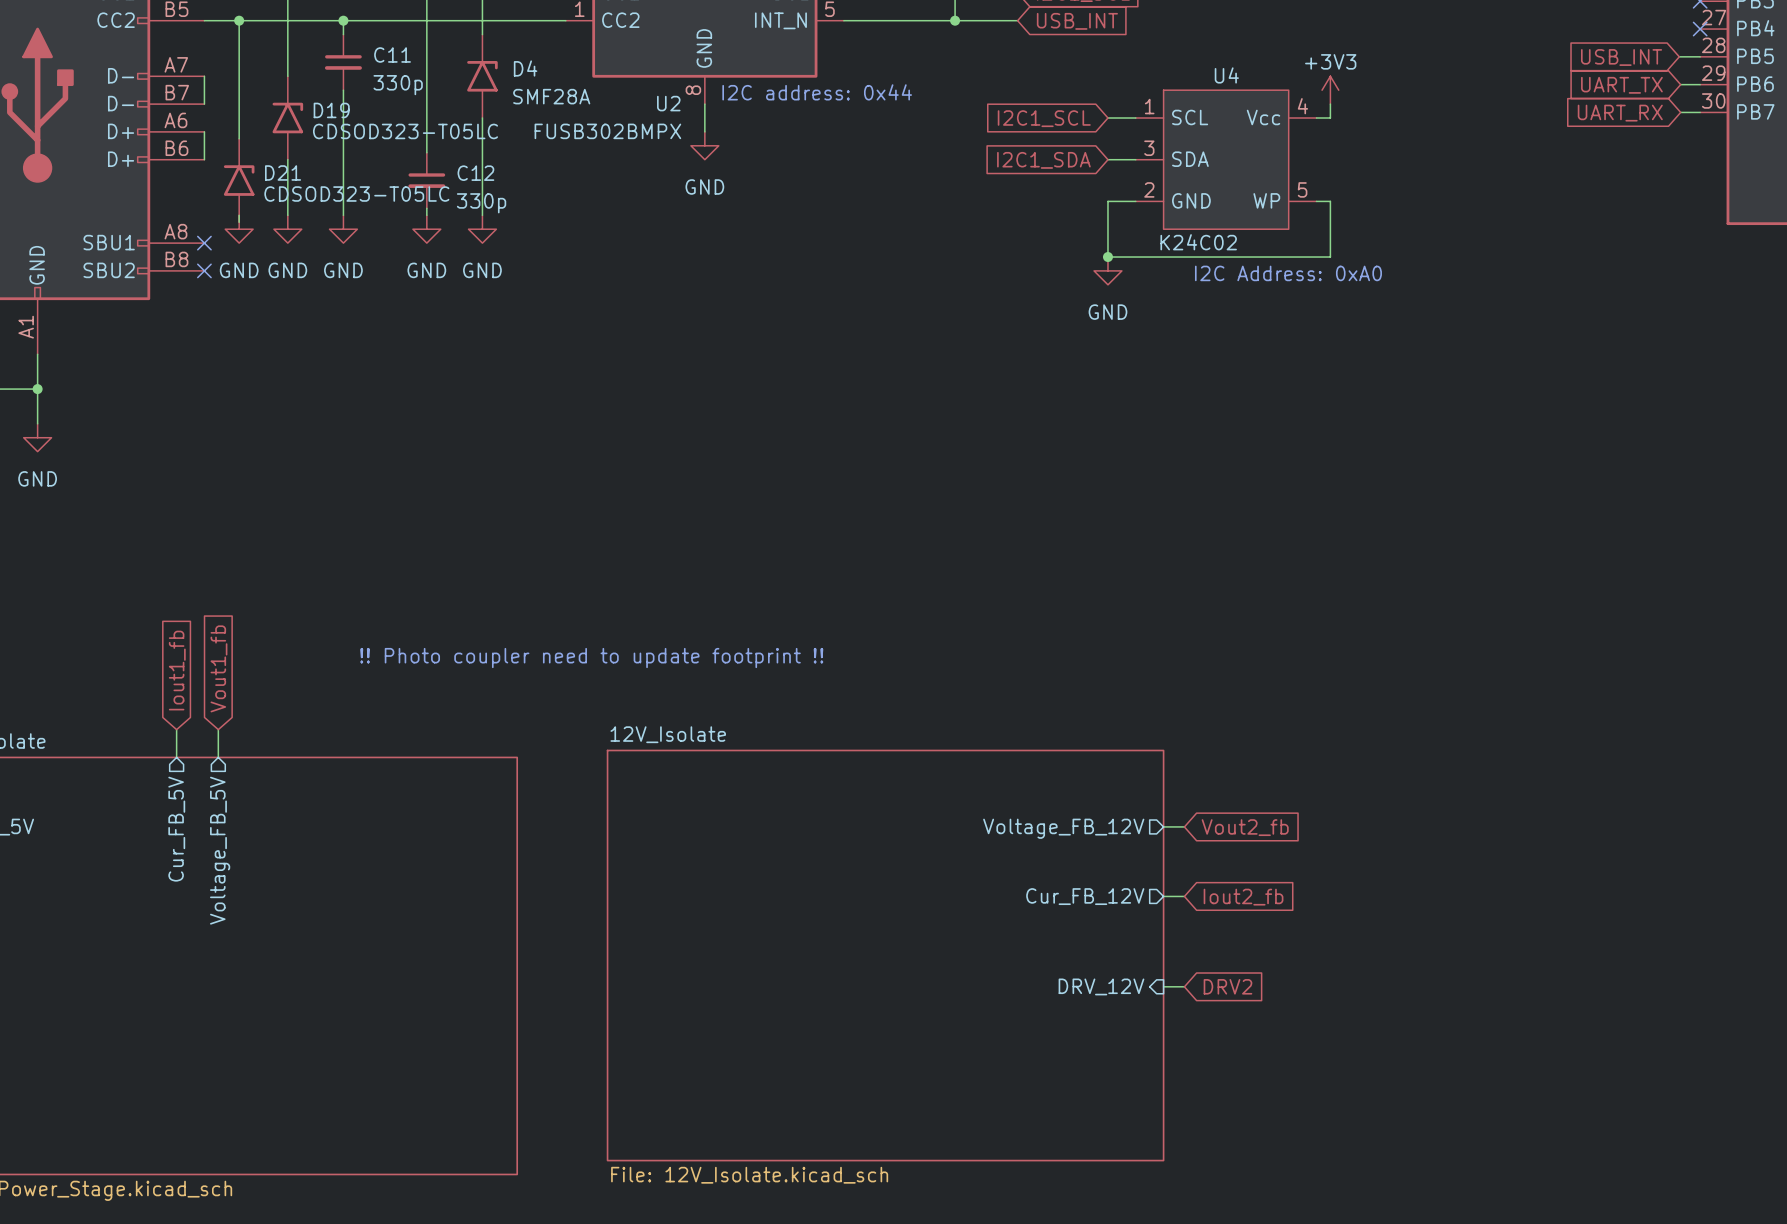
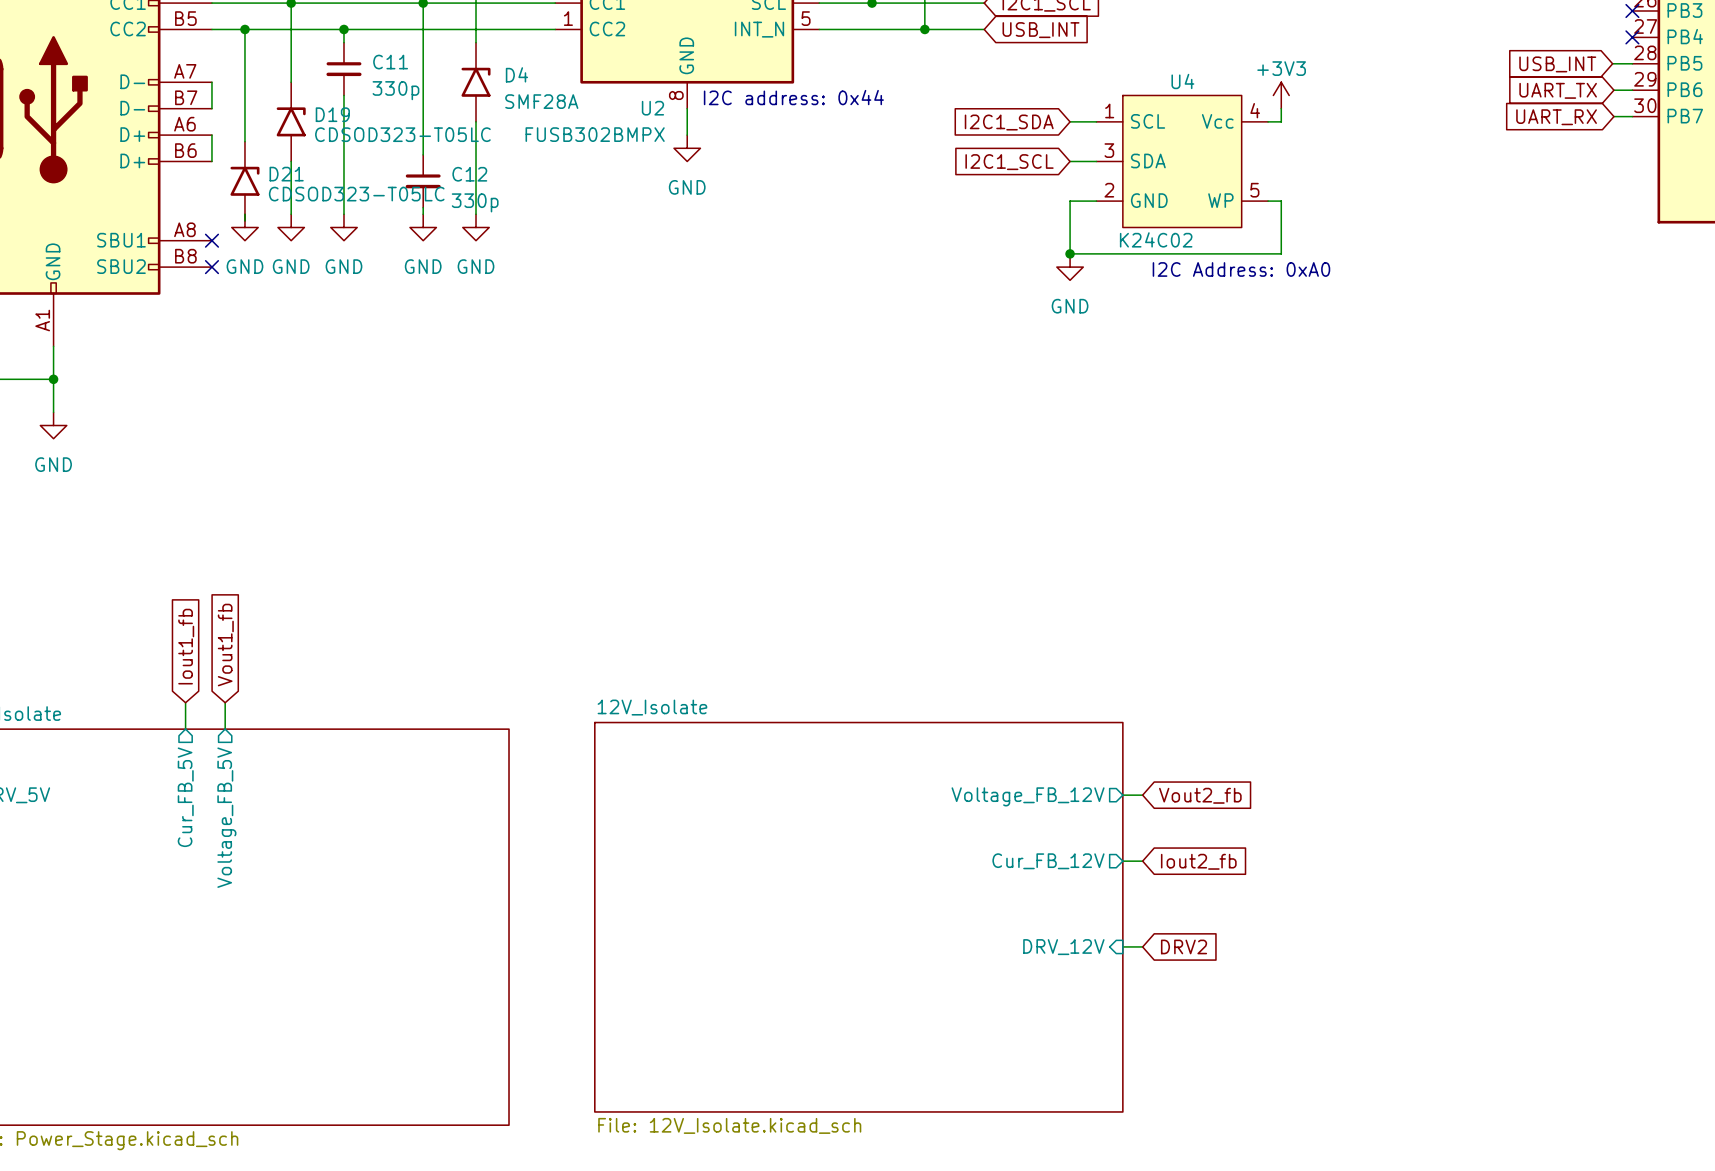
global label: I2C1_SCL (1044, 118) -> I2C1_SDA (1009, 122)
global label: I2C1_SDA (1043, 160) -> I2C1_SCL (1009, 162)
text: !! Photo coupler need to update footprint !! (591, 658) -> none

